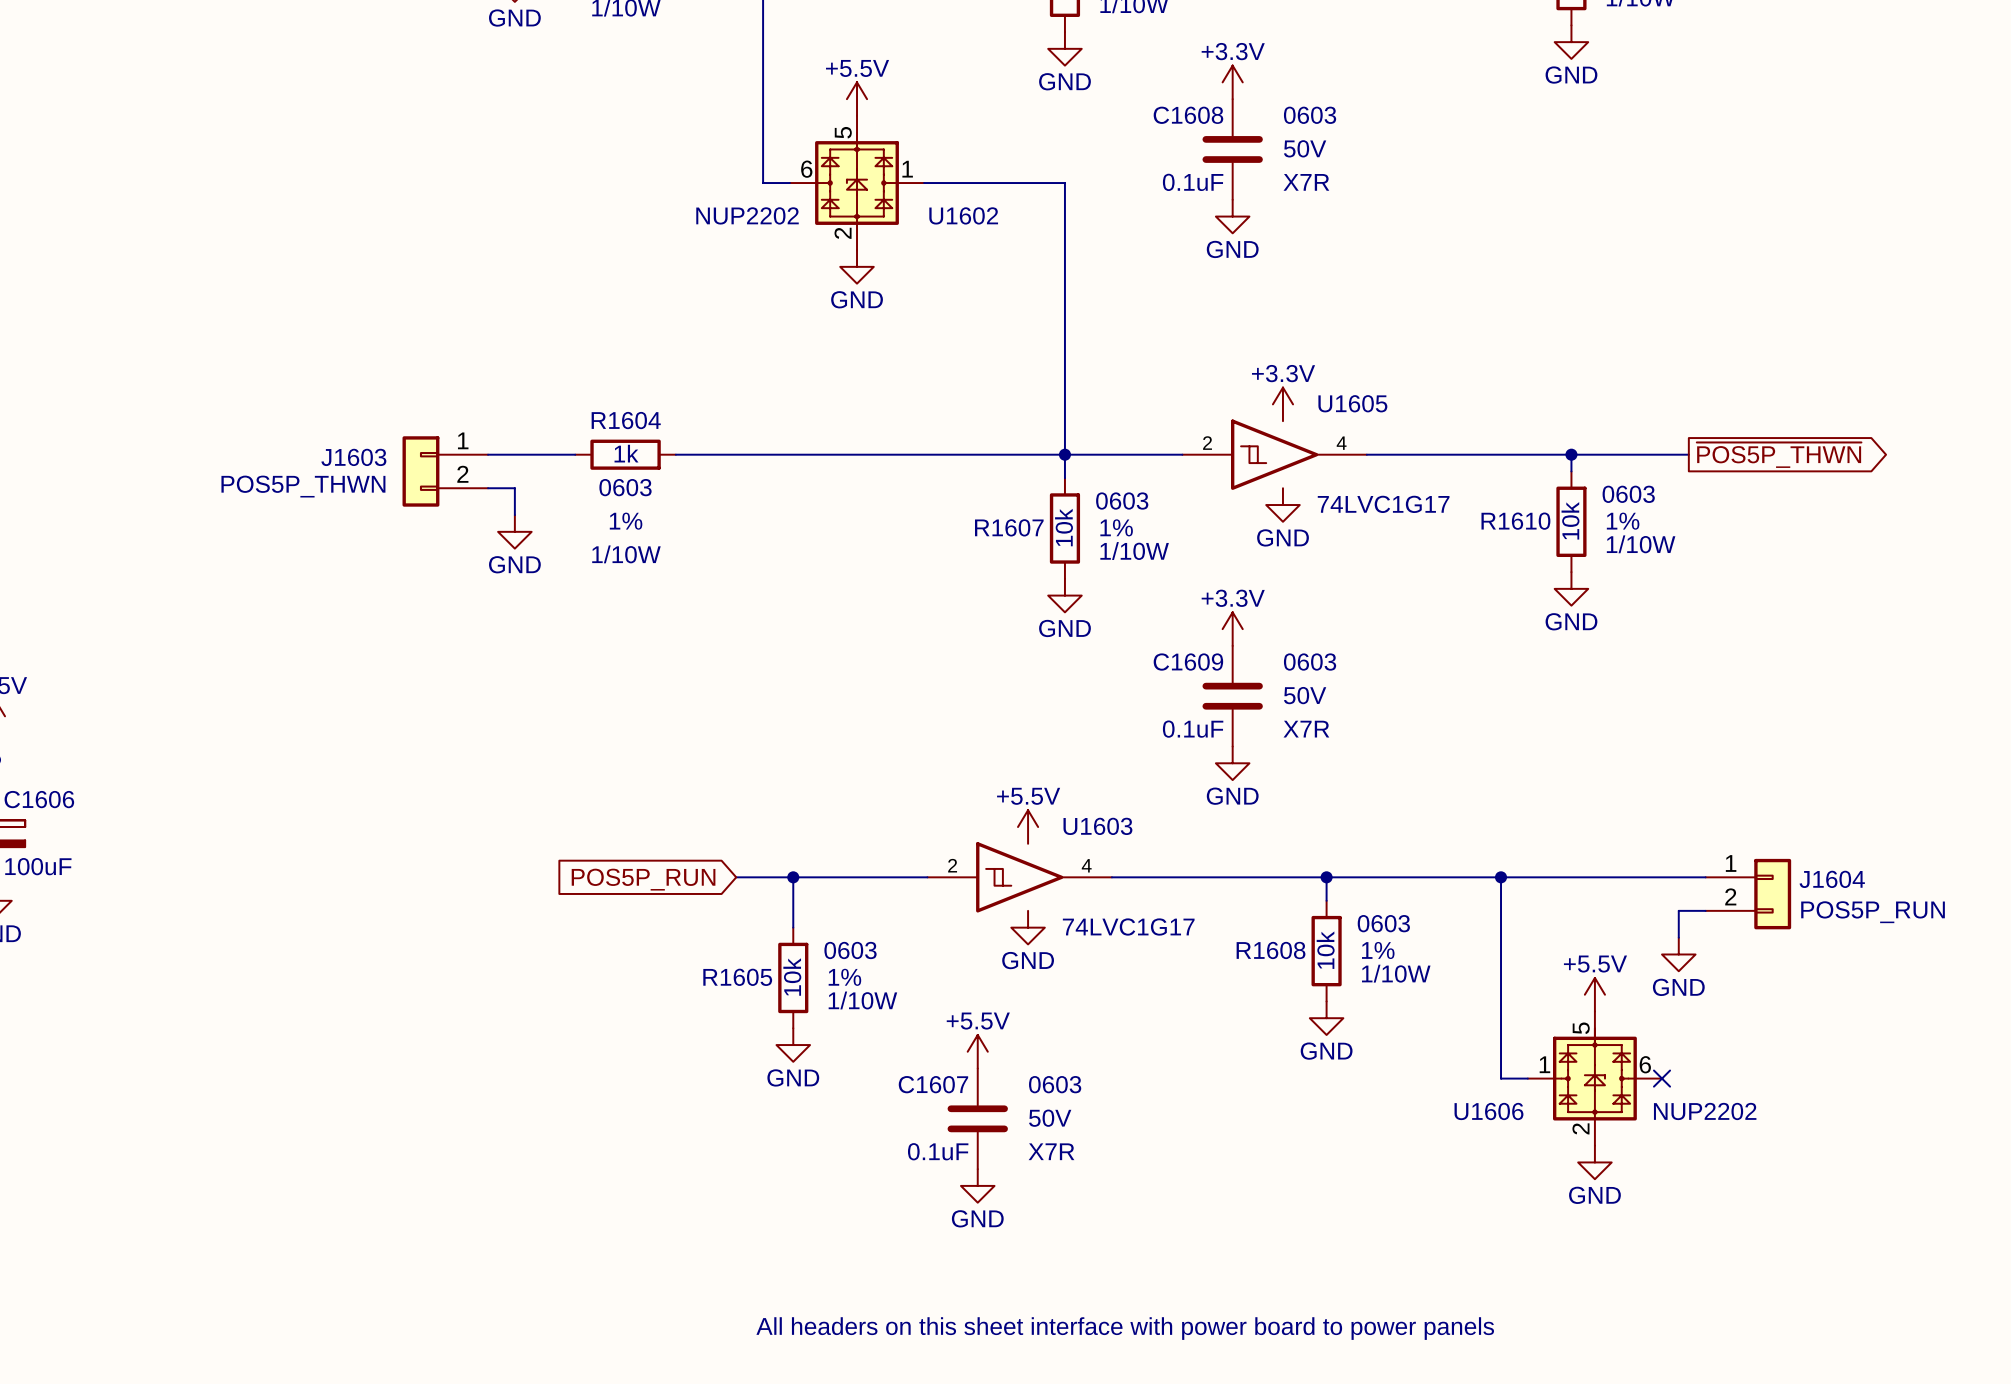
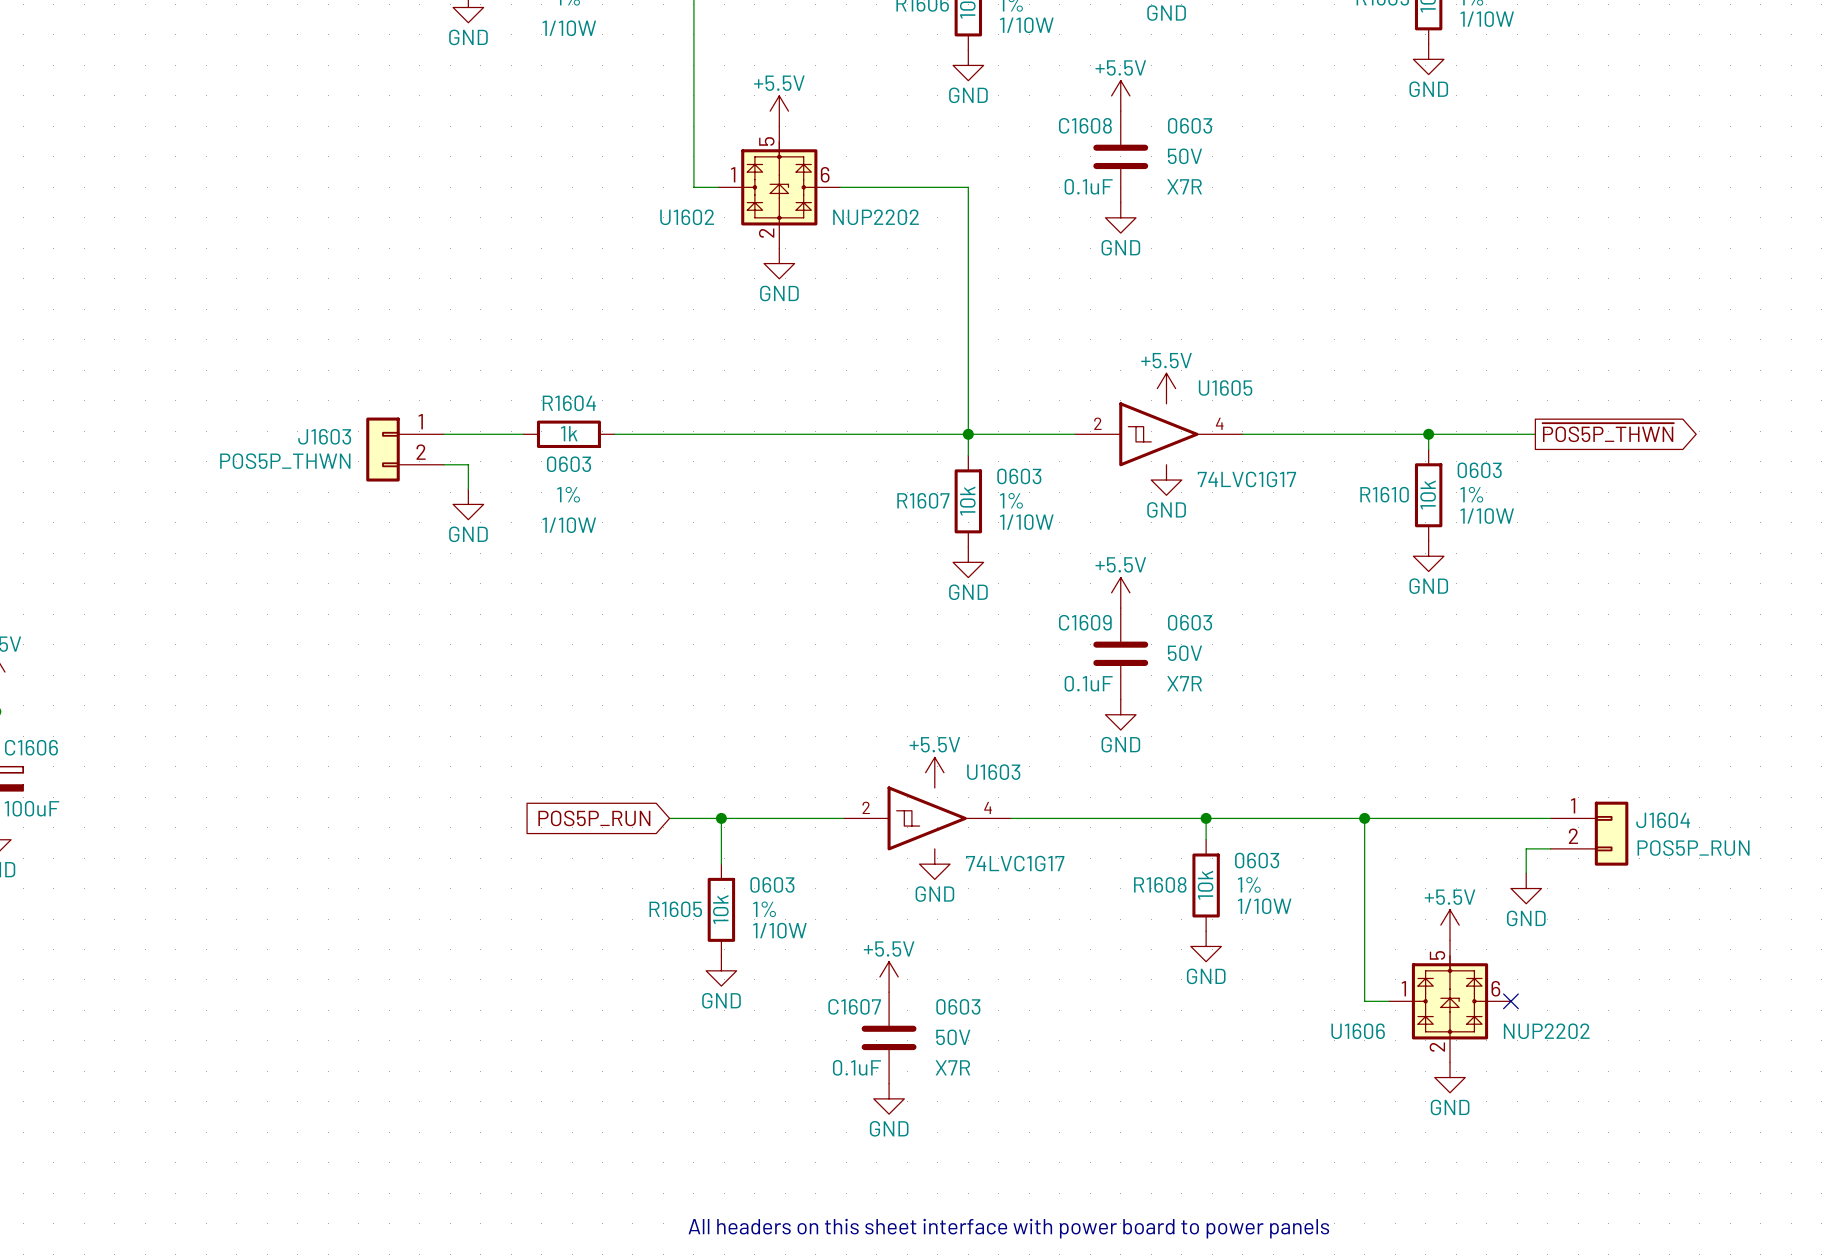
power symbol: +3.3V (1232, 82) -> +5.5V (1120, 95)
U1602 flip: as is (857, 178) -> left-right (779, 183)
power symbol: +3.3V (1282, 404) -> +5.5V (1166, 388)
power symbol: +3.3V (1232, 629) -> +5.5V (1120, 592)

